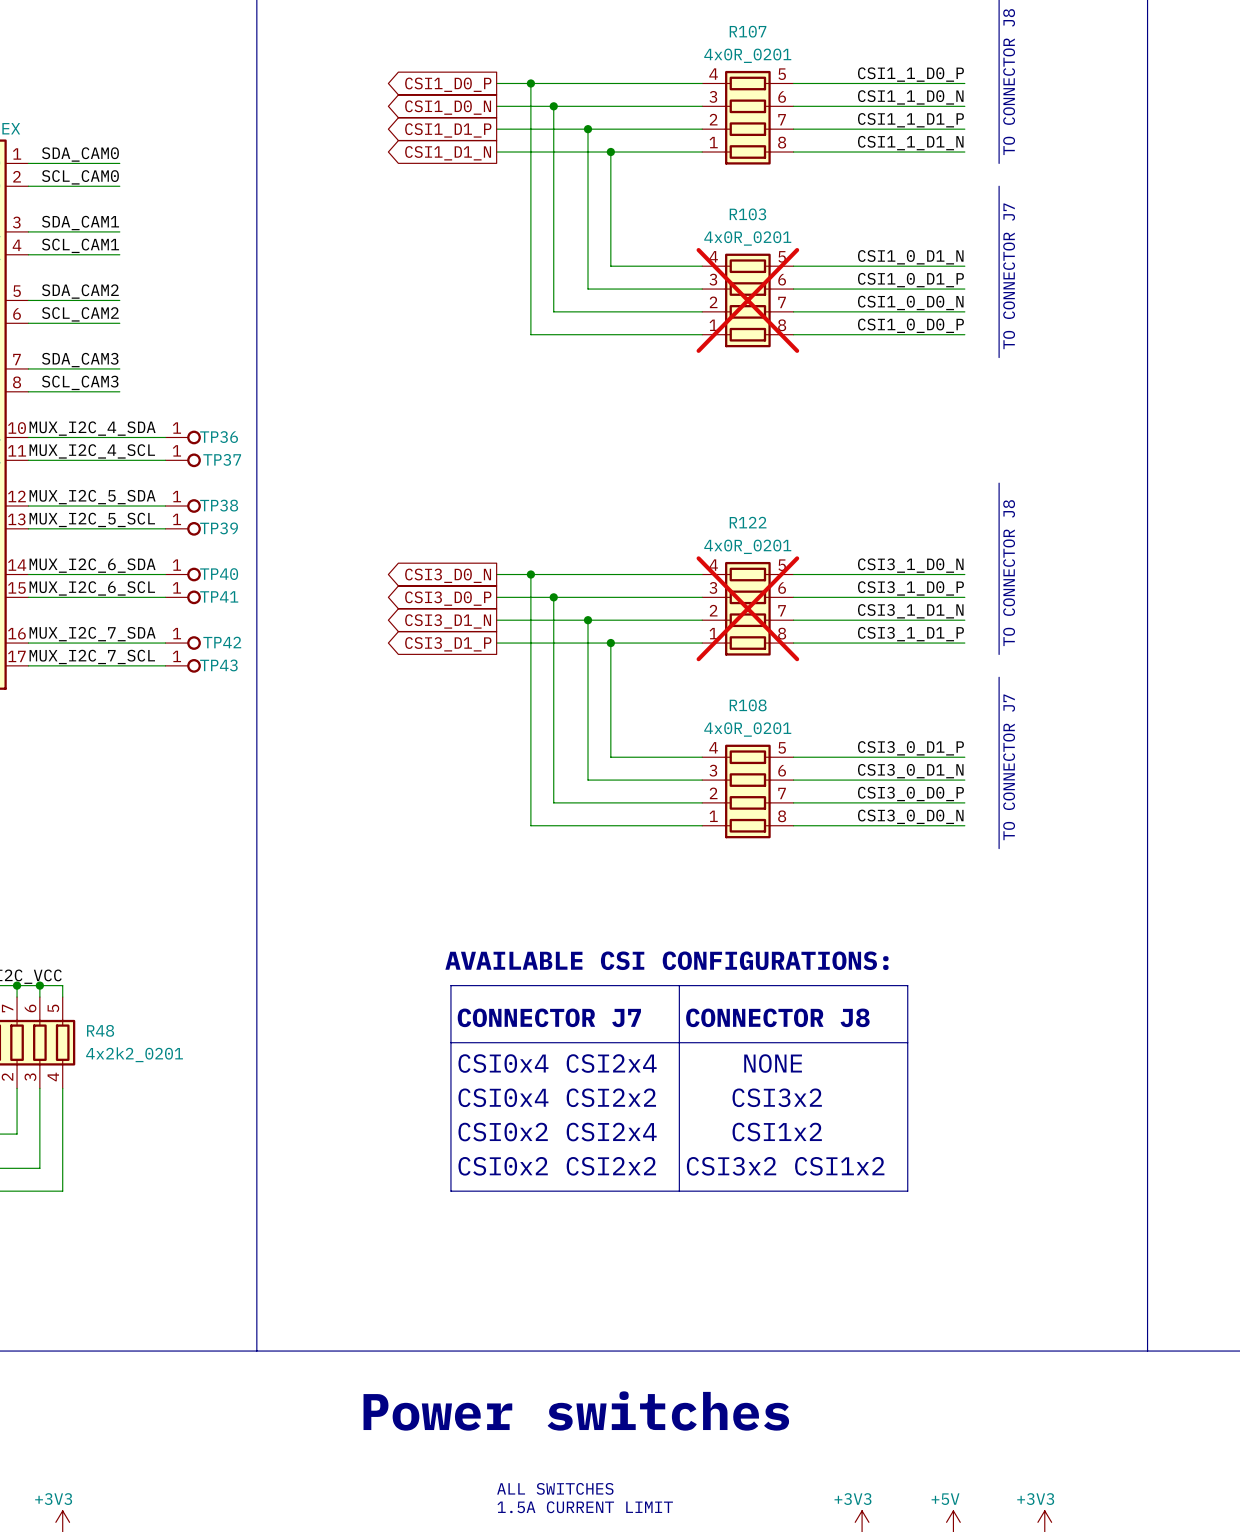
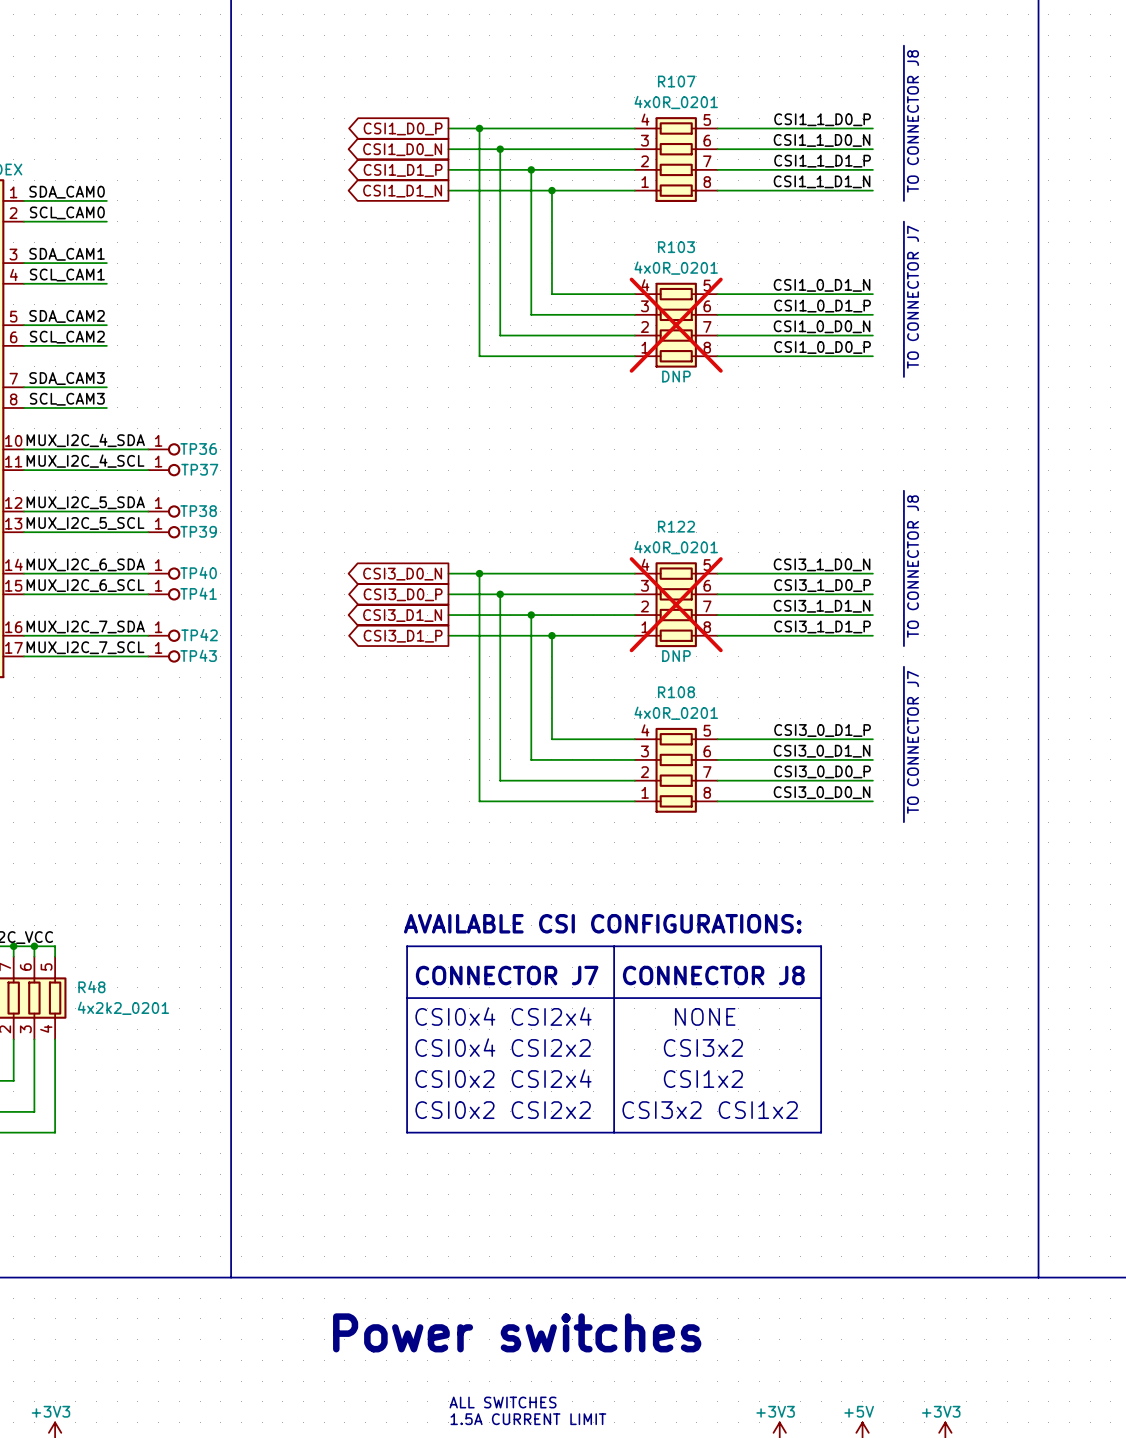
R103 text: none -> DNP (676, 376)
R122 text: none -> DNP (676, 656)

